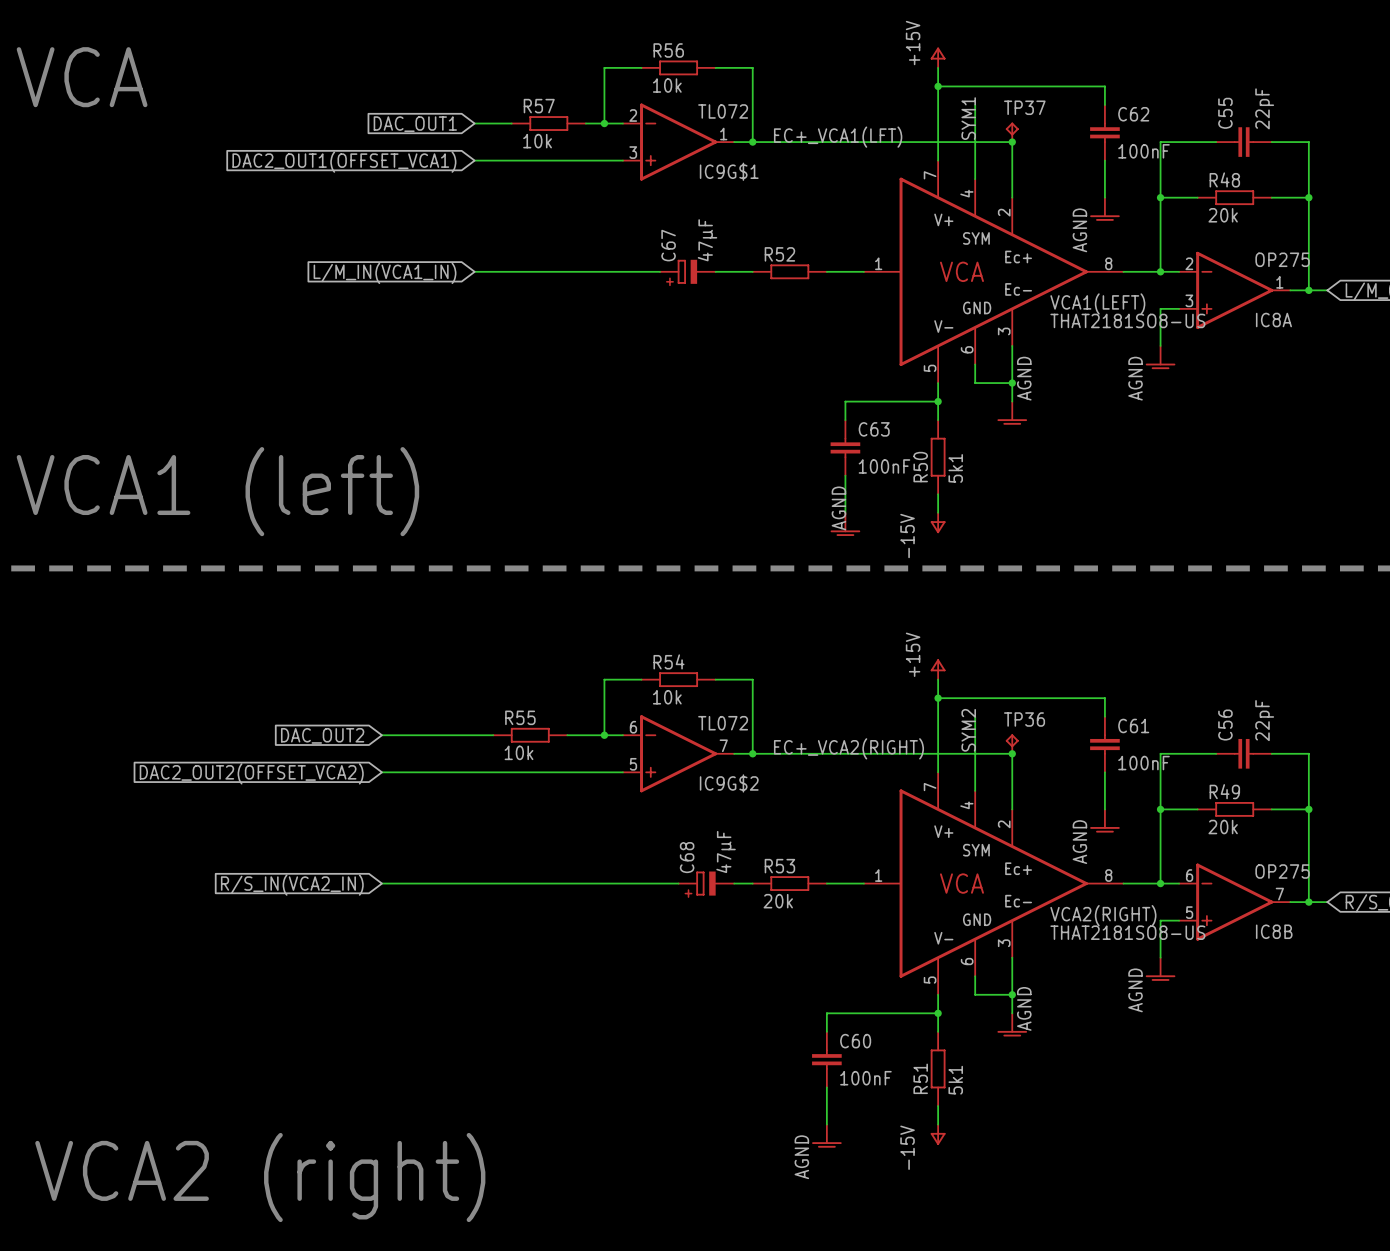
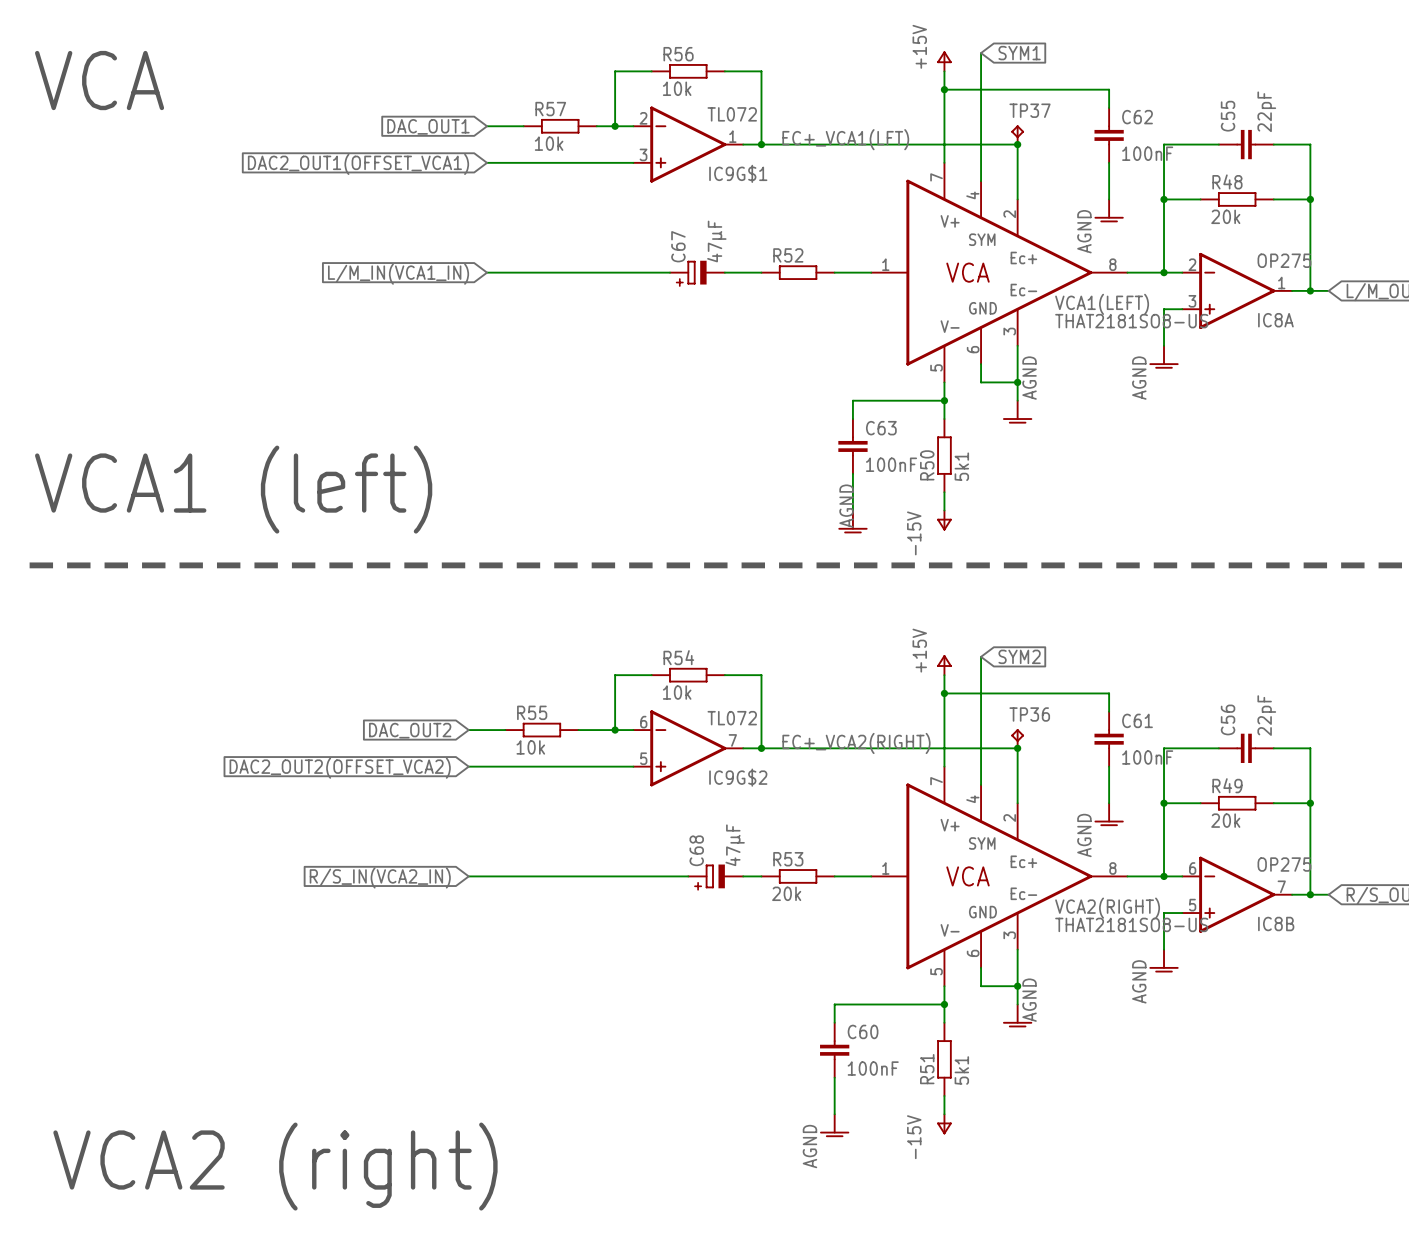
wire: none -> (981, 53) (981, 107)
global label: none -> SYM1 (1019, 53)
label: SYM1 (968, 118) -> none
wire: none -> (981, 656) (981, 711)
global label: none -> SYM2 (1019, 656)
label: SYM2 (968, 730) -> none
global label position: DAC_OUT2 (322, 735) -> DAC_OUT2 (410, 730)
wire: (381, 735) (456, 735) -> none
wire: (381, 772) (456, 772) -> none
global label position: DAC2_OUT2(OFFSET_VCA2) (251, 773) -> DAC2_OUT2(OFFSET_VCA2) (340, 768)
wire: (381, 883) (456, 883) -> none
global label position: R/S_IN(VCA2_IN) (292, 885) -> R/S_IN(VCA2_IN) (380, 877)

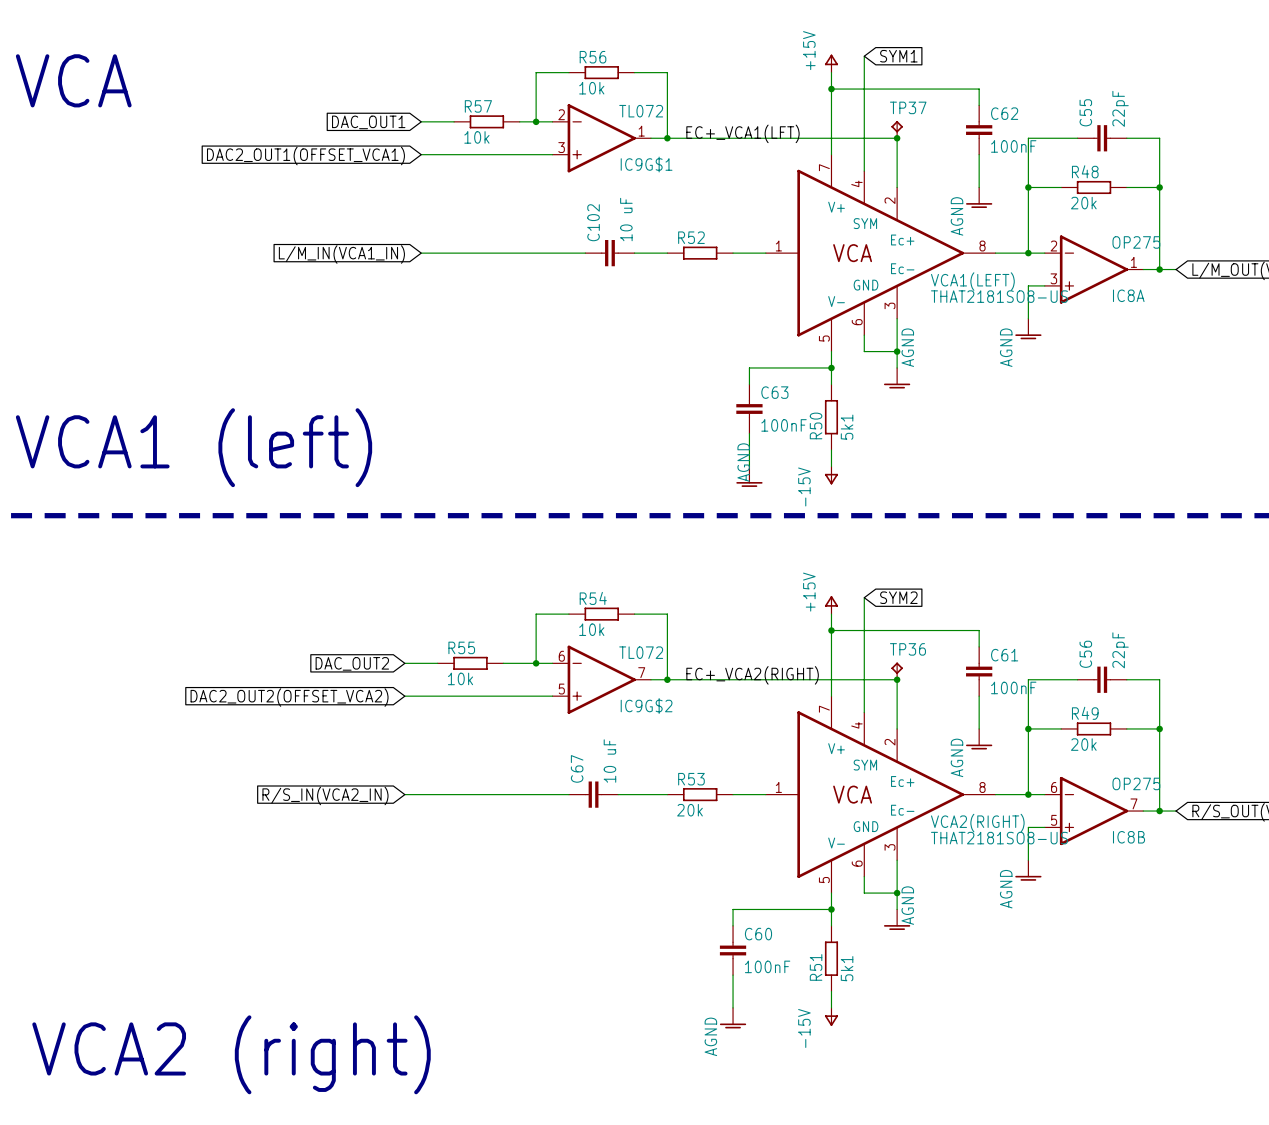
C67 value: 47µF (716, 241) -> 10 uF (609, 761)
C67 symbol: [670, 260, 725, 285] -> [568, 781, 619, 808]
C102: none -> 10 uF (609, 253)
C68: 47µF (715, 876) -> none

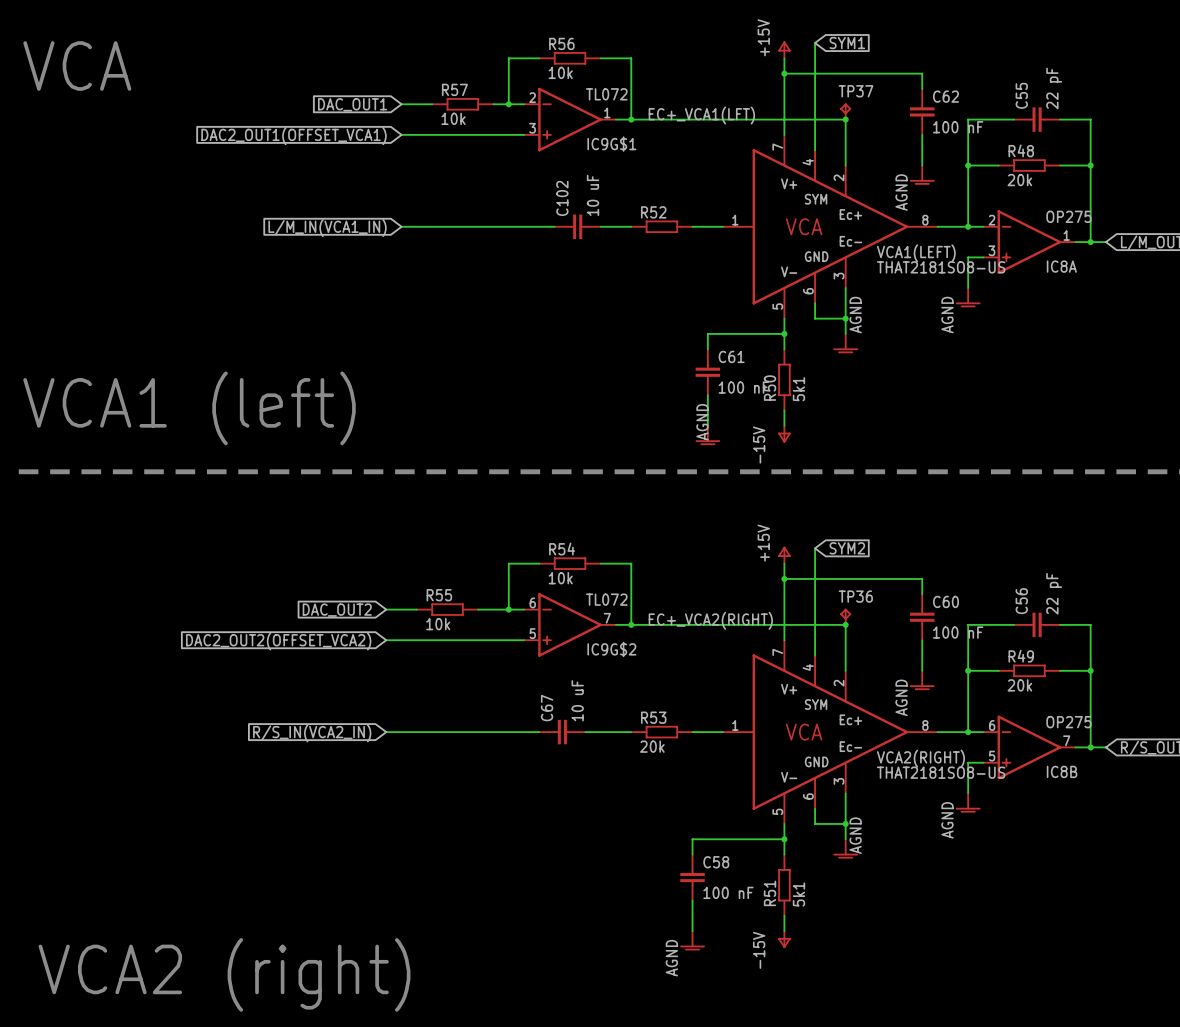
C55 value: 22pF (1120, 108) -> 22 pF (1054, 88)
C62 value: 100nF (1013, 146) -> 100 nF (958, 127)
C63 name: C63 (774, 392) -> C61 (731, 356)
C63 value: 100nF (784, 425) -> 100 nF (743, 387)
C56 value: 22pF (1120, 650) -> 22 pF (1054, 593)
C61 name: C61 (1004, 655) -> C60 (945, 601)
C61 value: 100nF (1013, 687) -> 100 nF (958, 632)
C60 name: C60 (758, 934) -> C58 (716, 862)
C60 value: 100nF (767, 966) -> 100 nF (728, 892)

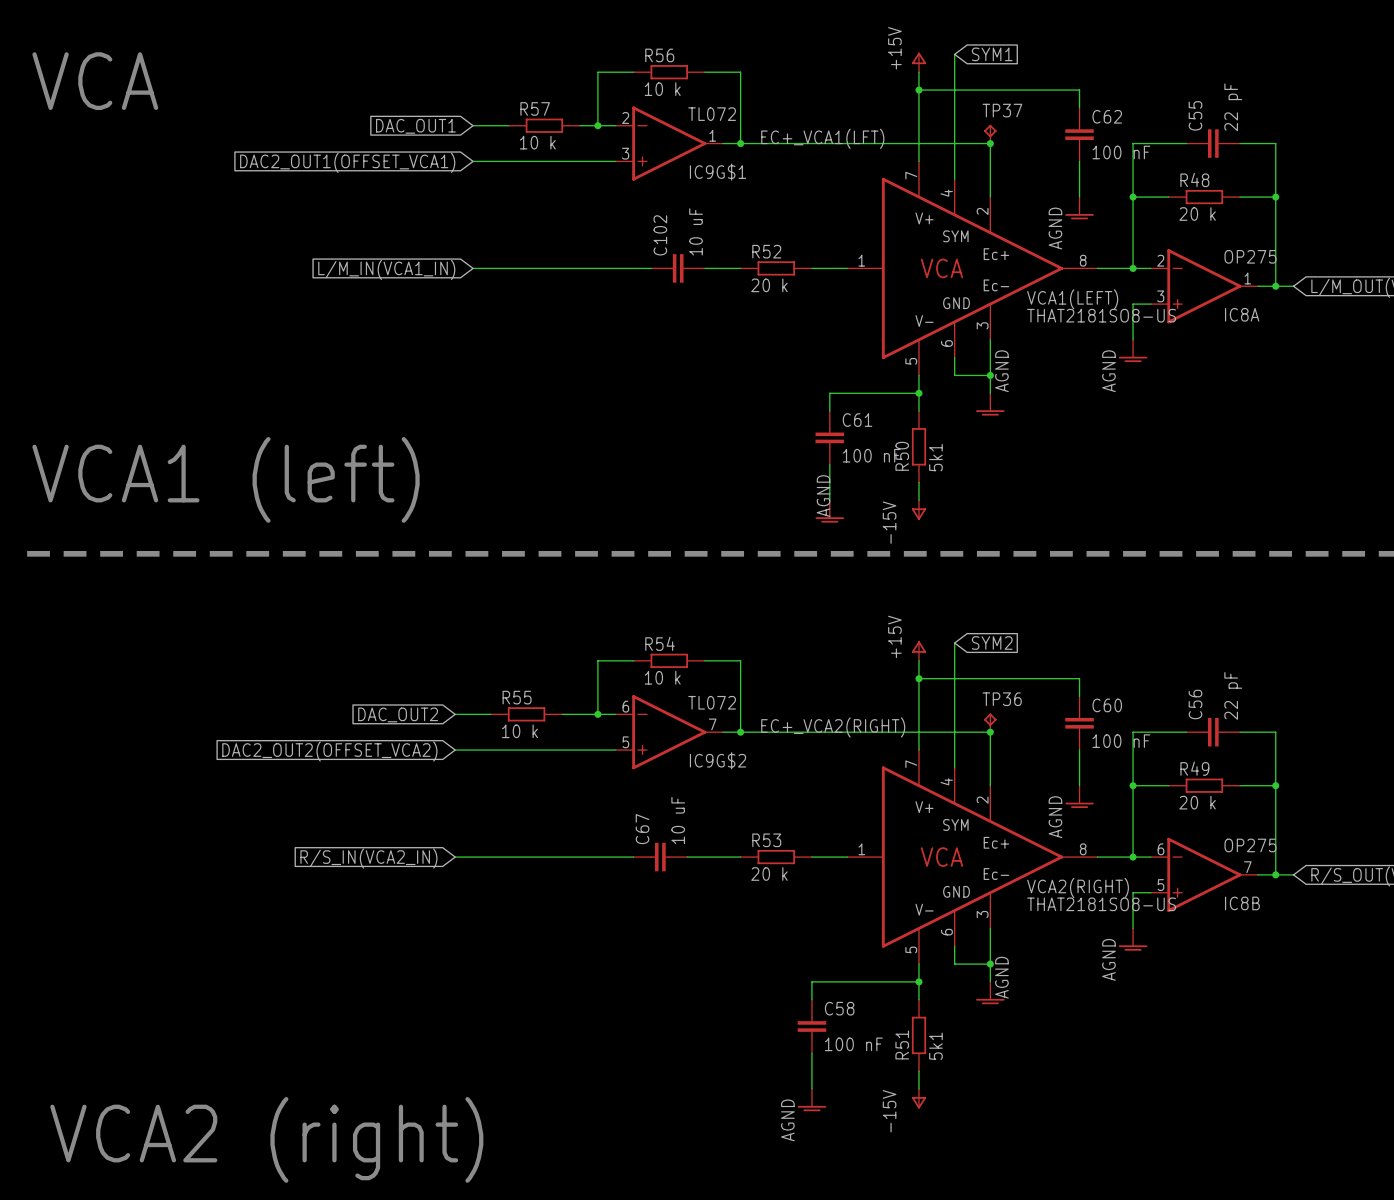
R56 value: 10k (560, 72) -> 10 k (662, 89)
R57 value: 10k (453, 118) -> 10 k (537, 142)
R48 value: 20k (1019, 180) -> 20 k (1197, 214)
R52 value: none -> 20 k (769, 285)
R54 value: 10k (560, 578) -> 10 k (662, 677)
R55 value: 10k (438, 624) -> 10 k (520, 731)
R49 value: 20k (1019, 685) -> 20 k (1197, 802)
R53 value: 20k (652, 746) -> 20 k (769, 874)

